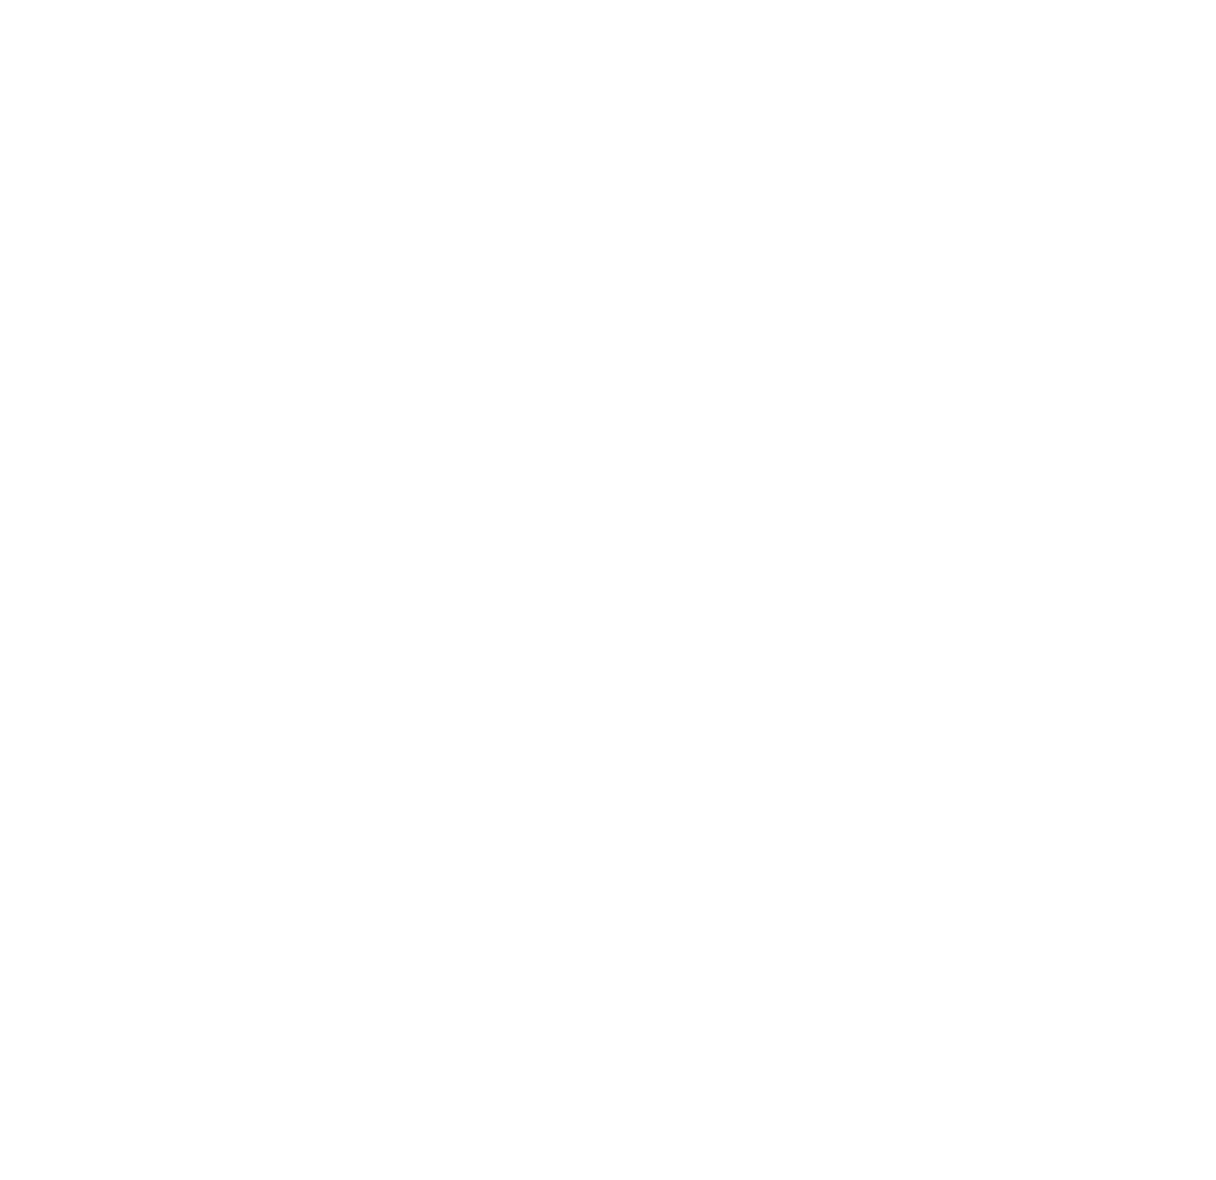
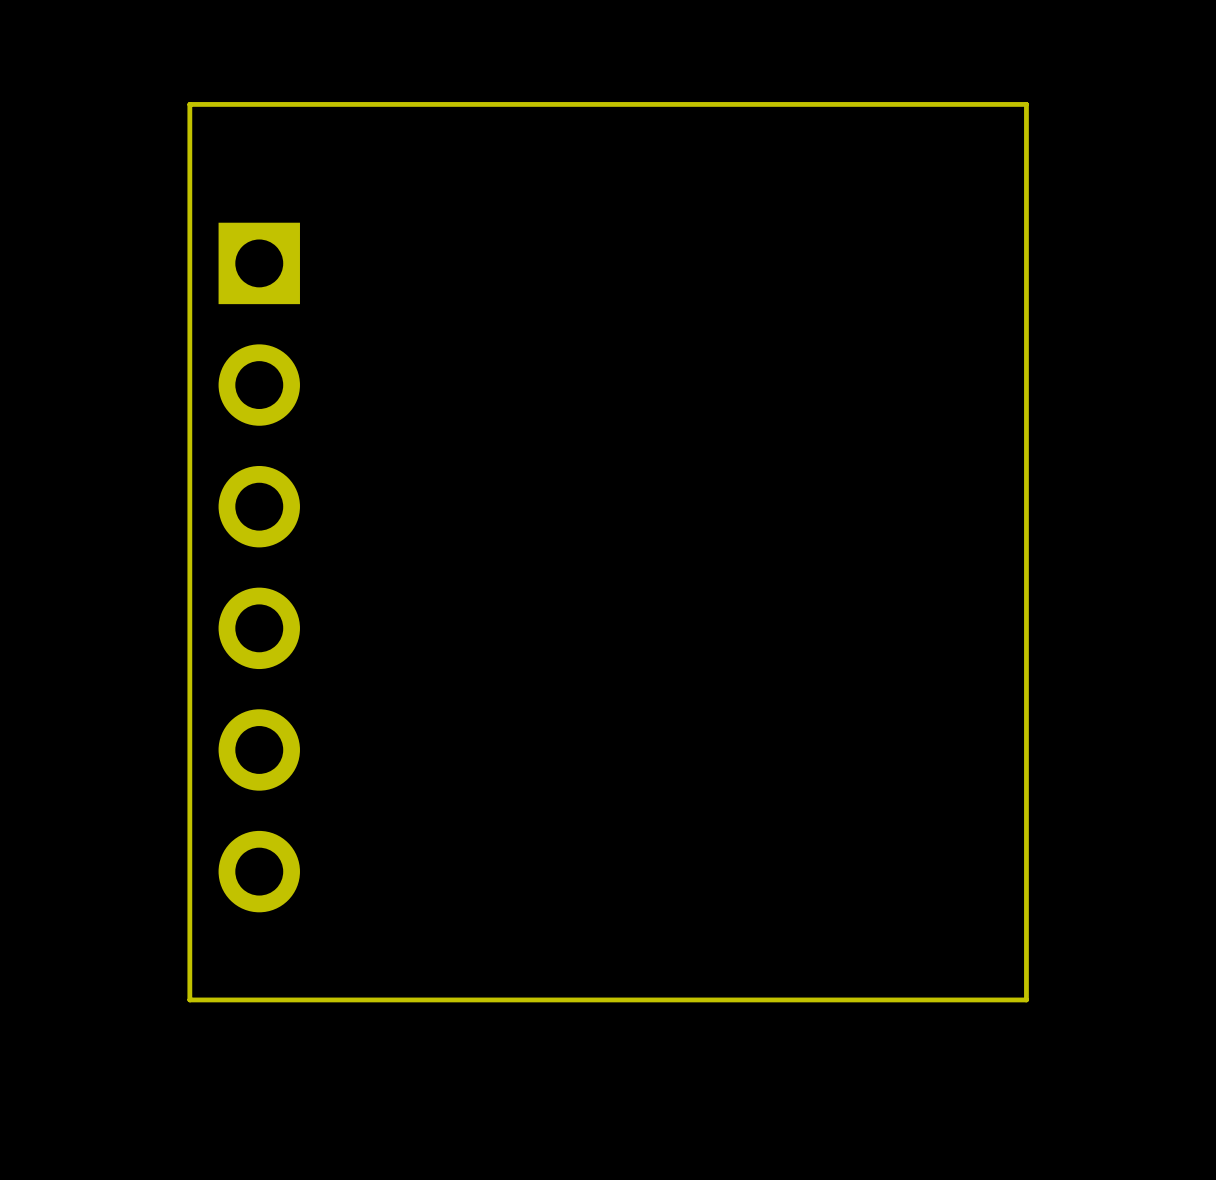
board edge: none -> (1026, 104) (189, 104) (189, 999) (1026, 999) (1026, 104)
part: none -> (259, 567)

